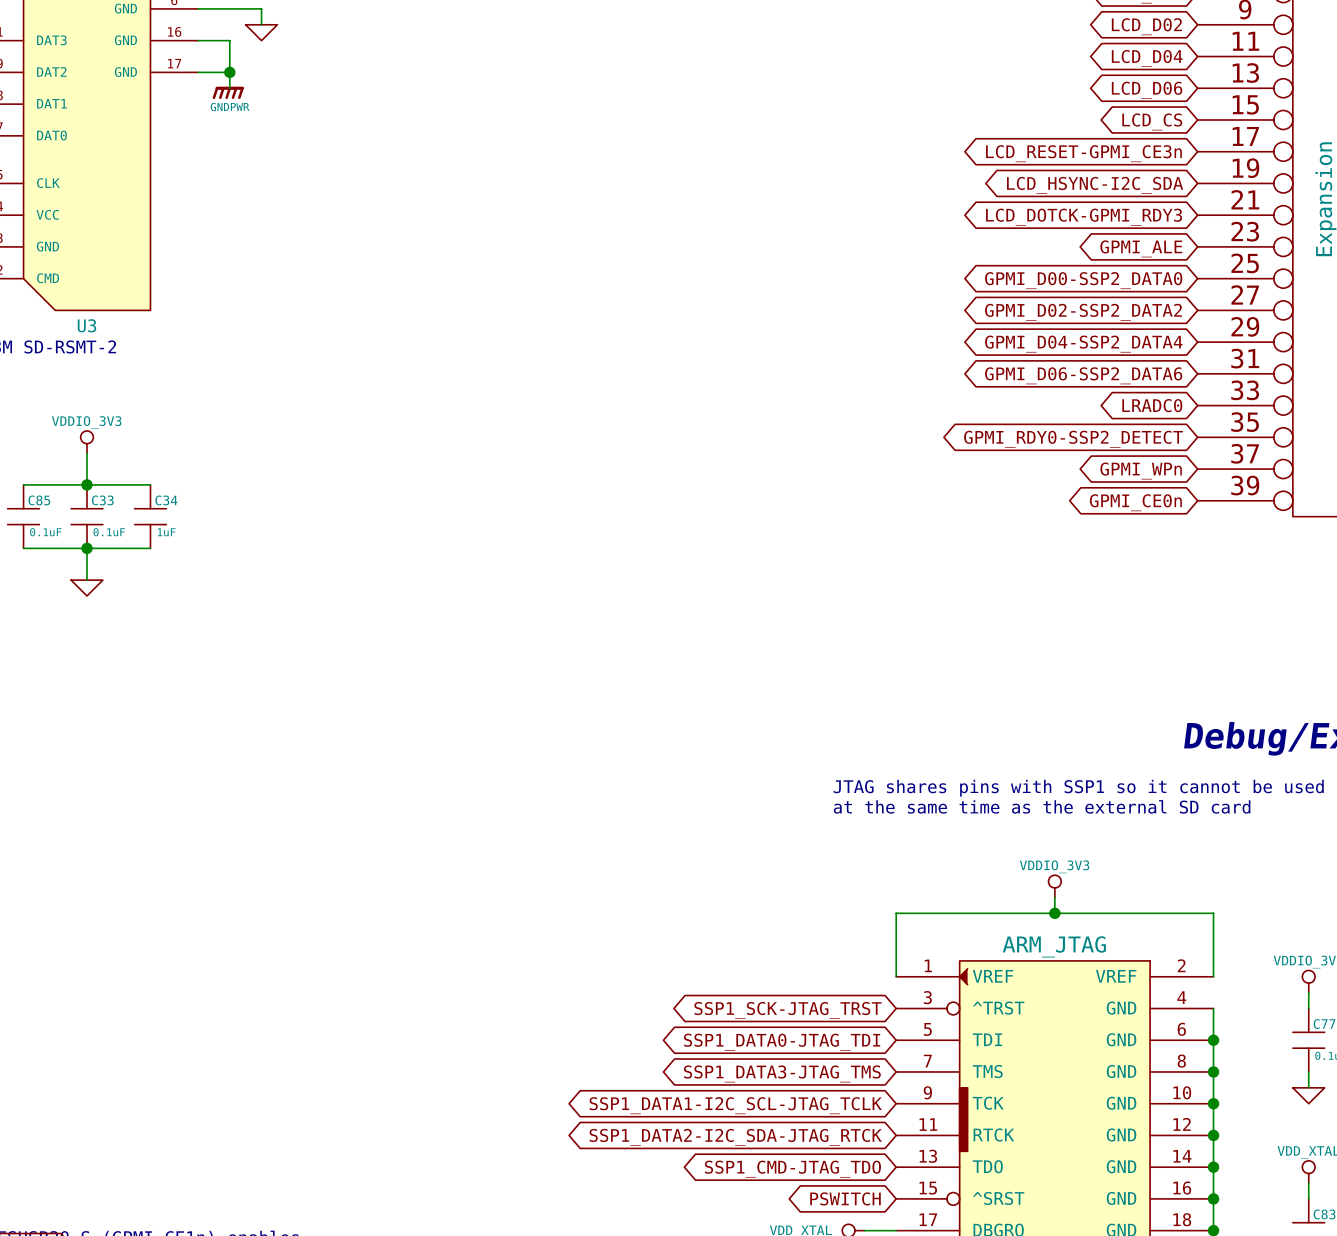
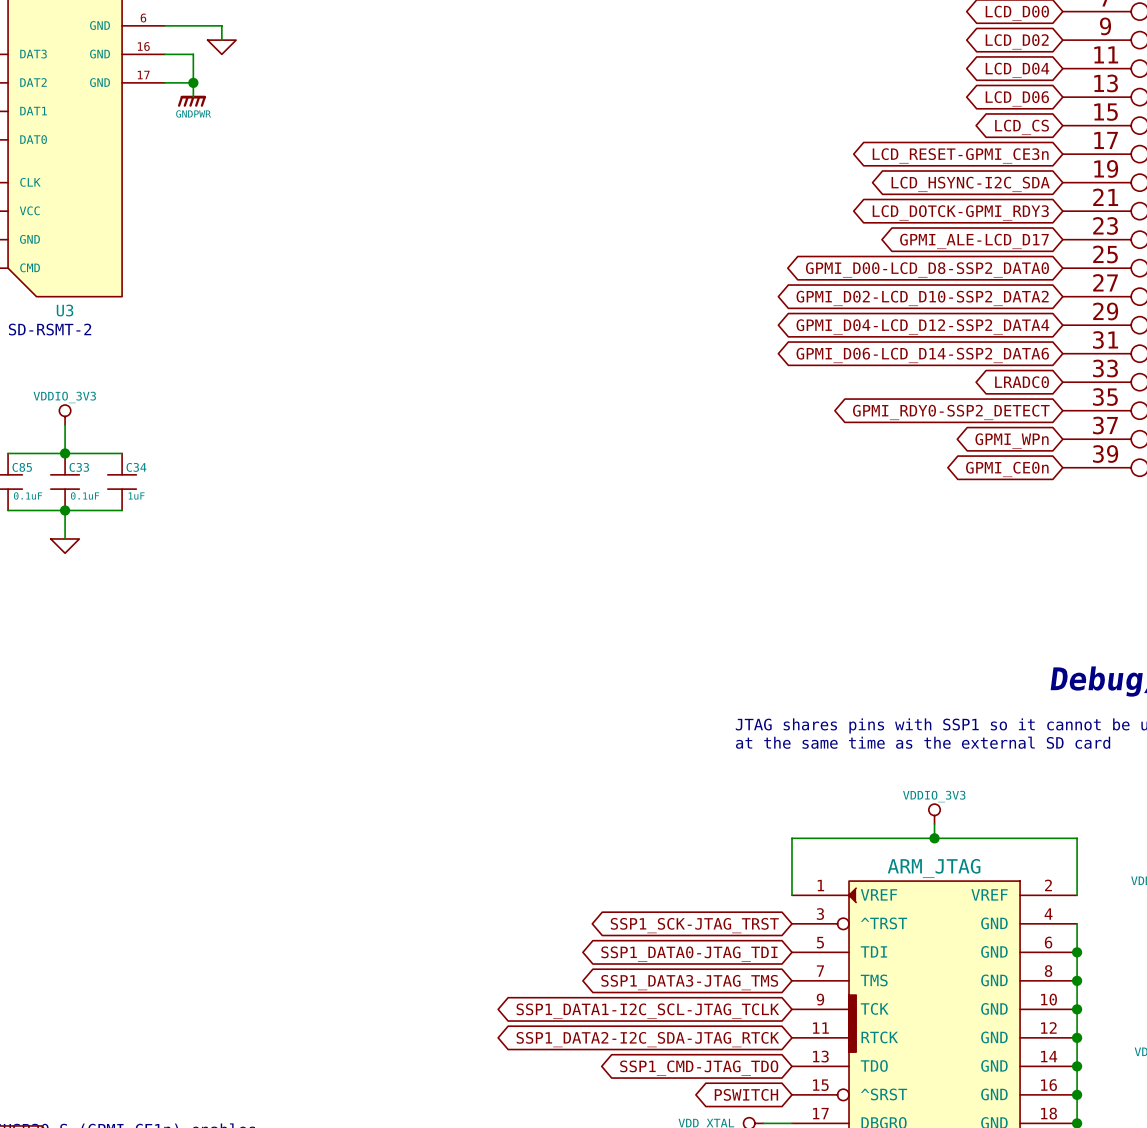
global label: GPMI_ALE (1141, 248) -> GPMI_ALE-LCD_D17 (974, 241)
global label: GPMI_D00-SSP2_DATA0 (1083, 280) -> GPMI_D00-LCD_D8-SSP2_DATA0 (927, 269)
global label: GPMI_D02-SSP2_DATA2 (1083, 312) -> GPMI_D02-LCD_D10-SSP2_DATA2 (922, 298)
global label: GPMI_D04-SSP2_DATA4 (1083, 344) -> GPMI_D04-LCD_D12-SSP2_DATA4 (922, 326)
global label: GPMI_D06-SSP2_DATA6 (1083, 375) -> GPMI_D06-LCD_D14-SSP2_DATA6 (922, 355)

